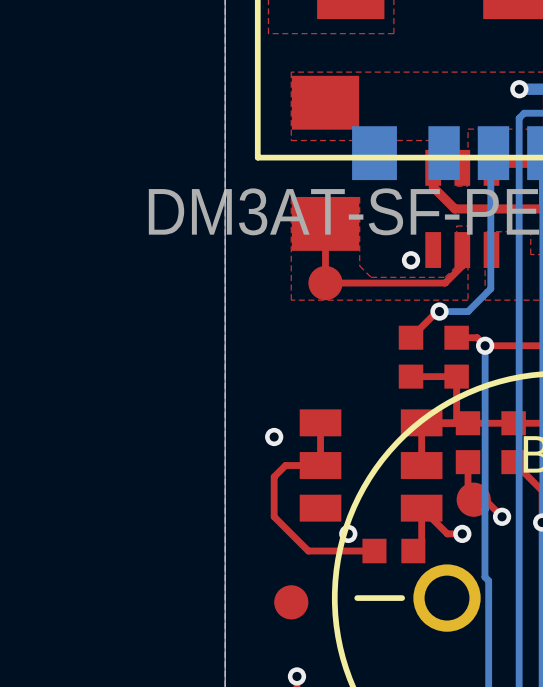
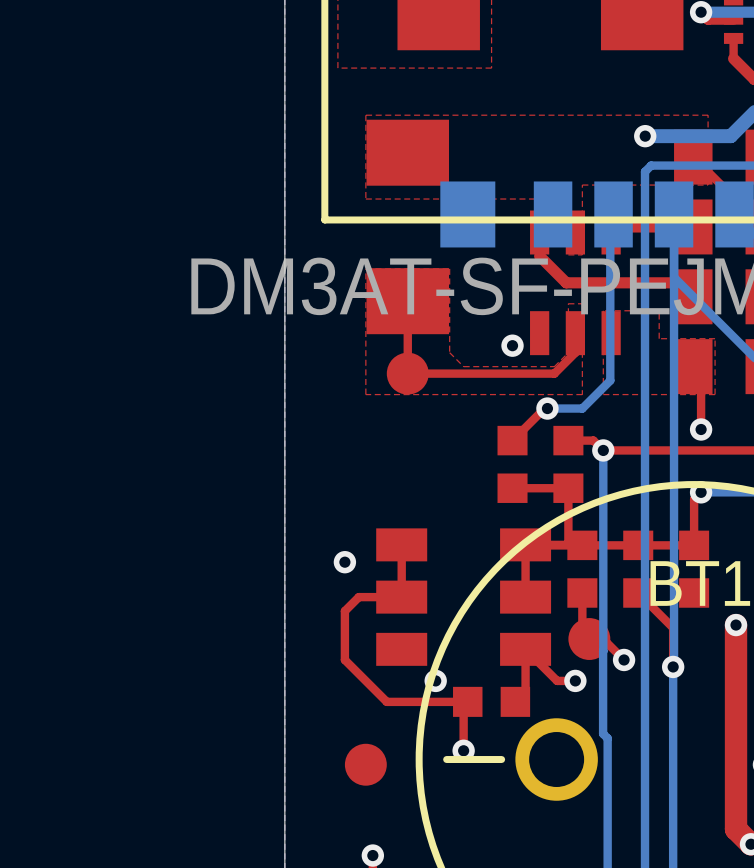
top track: none -> (463, 701) (463, 750)
via: none -> (463, 750)

